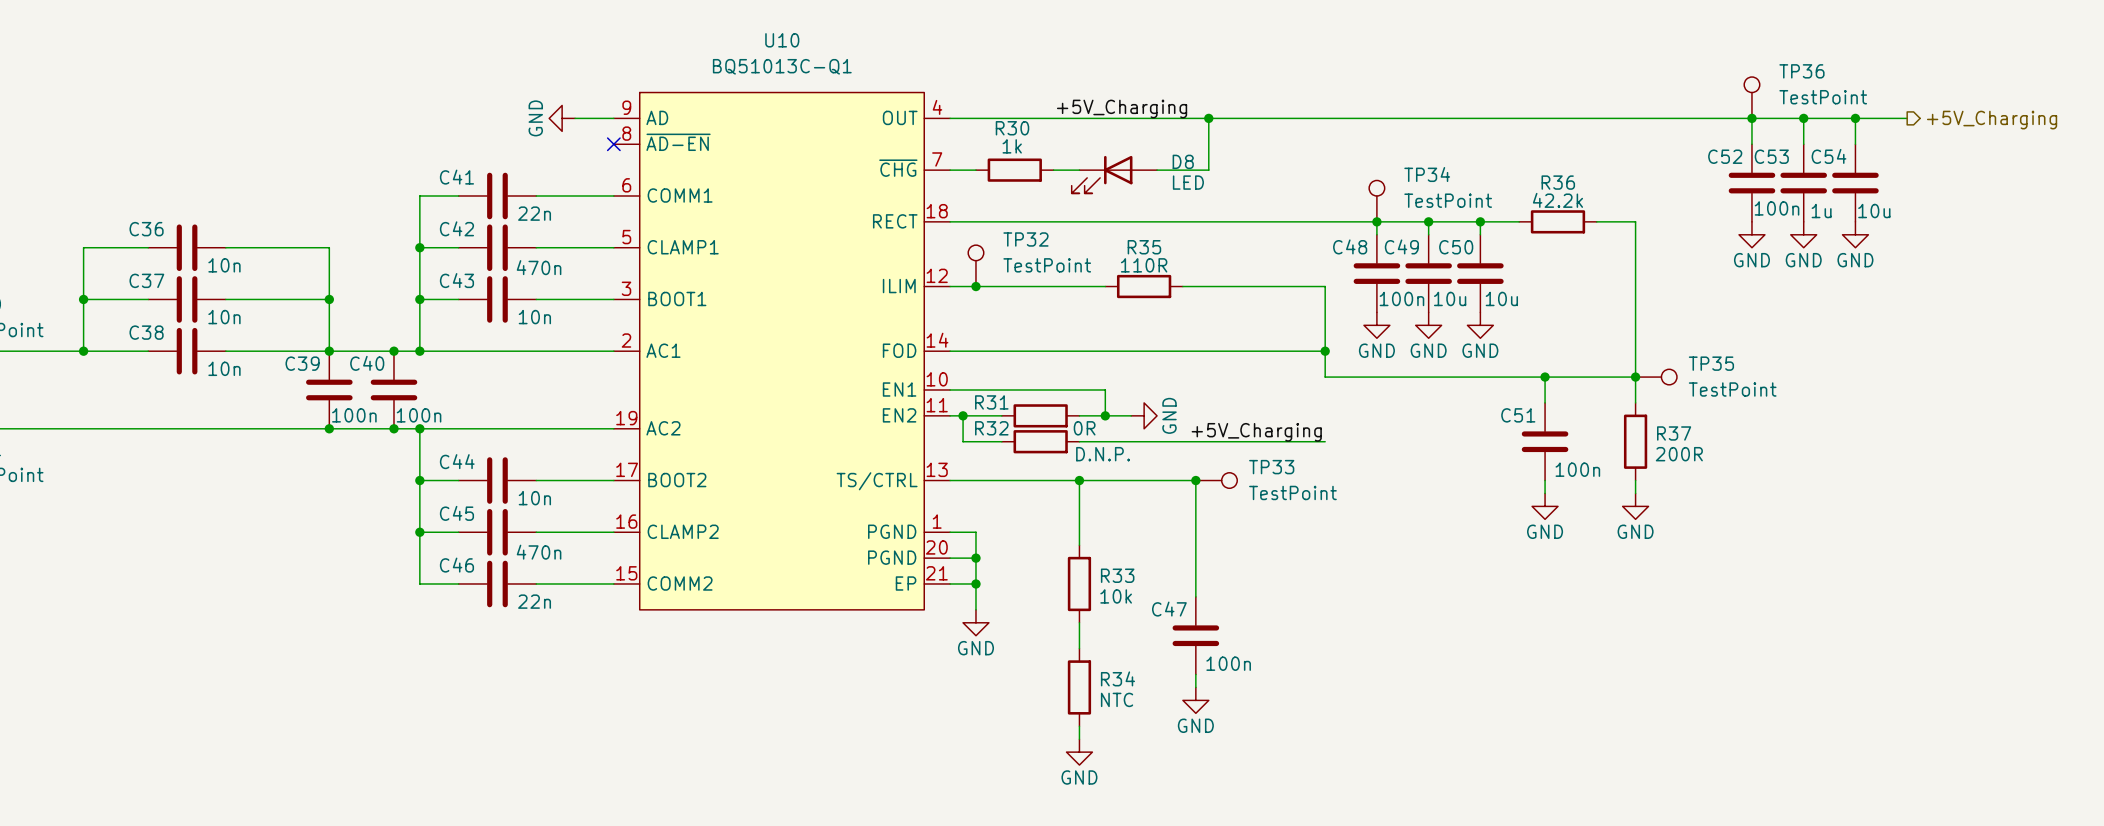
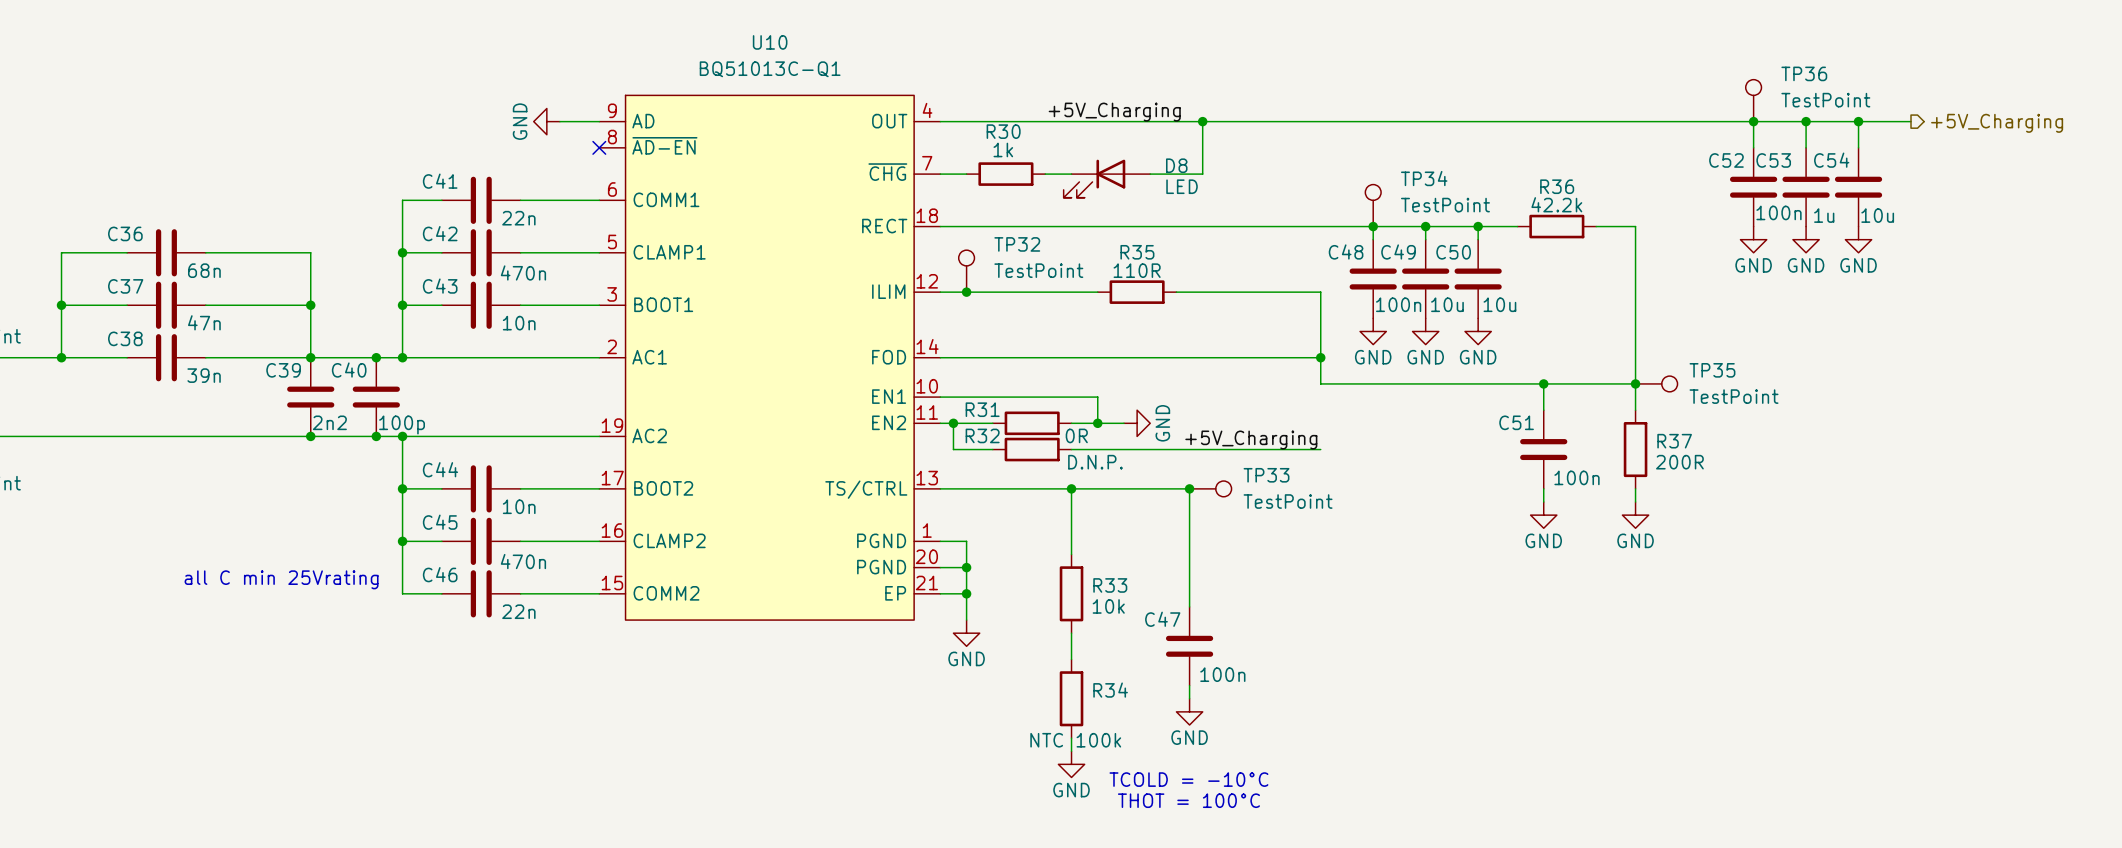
C36 value: 10n (224, 265) -> 68n (204, 270)
C37 value: 10n (224, 317) -> 47n (204, 322)
C38 value: 10n (224, 368) -> 39n (204, 375)
C39 value: 100n (354, 415) -> 2n2 (329, 422)
C40 value: 100n (419, 415) -> 100p (402, 425)
text: none -> all C min 25Vrating (281, 579)
R34 value: NTC (1117, 699) -> NTC 100k (1075, 740)
text: none -> TCOLD = -10°C (1188, 779)
text: none -> THOT = 100°C (1188, 800)

